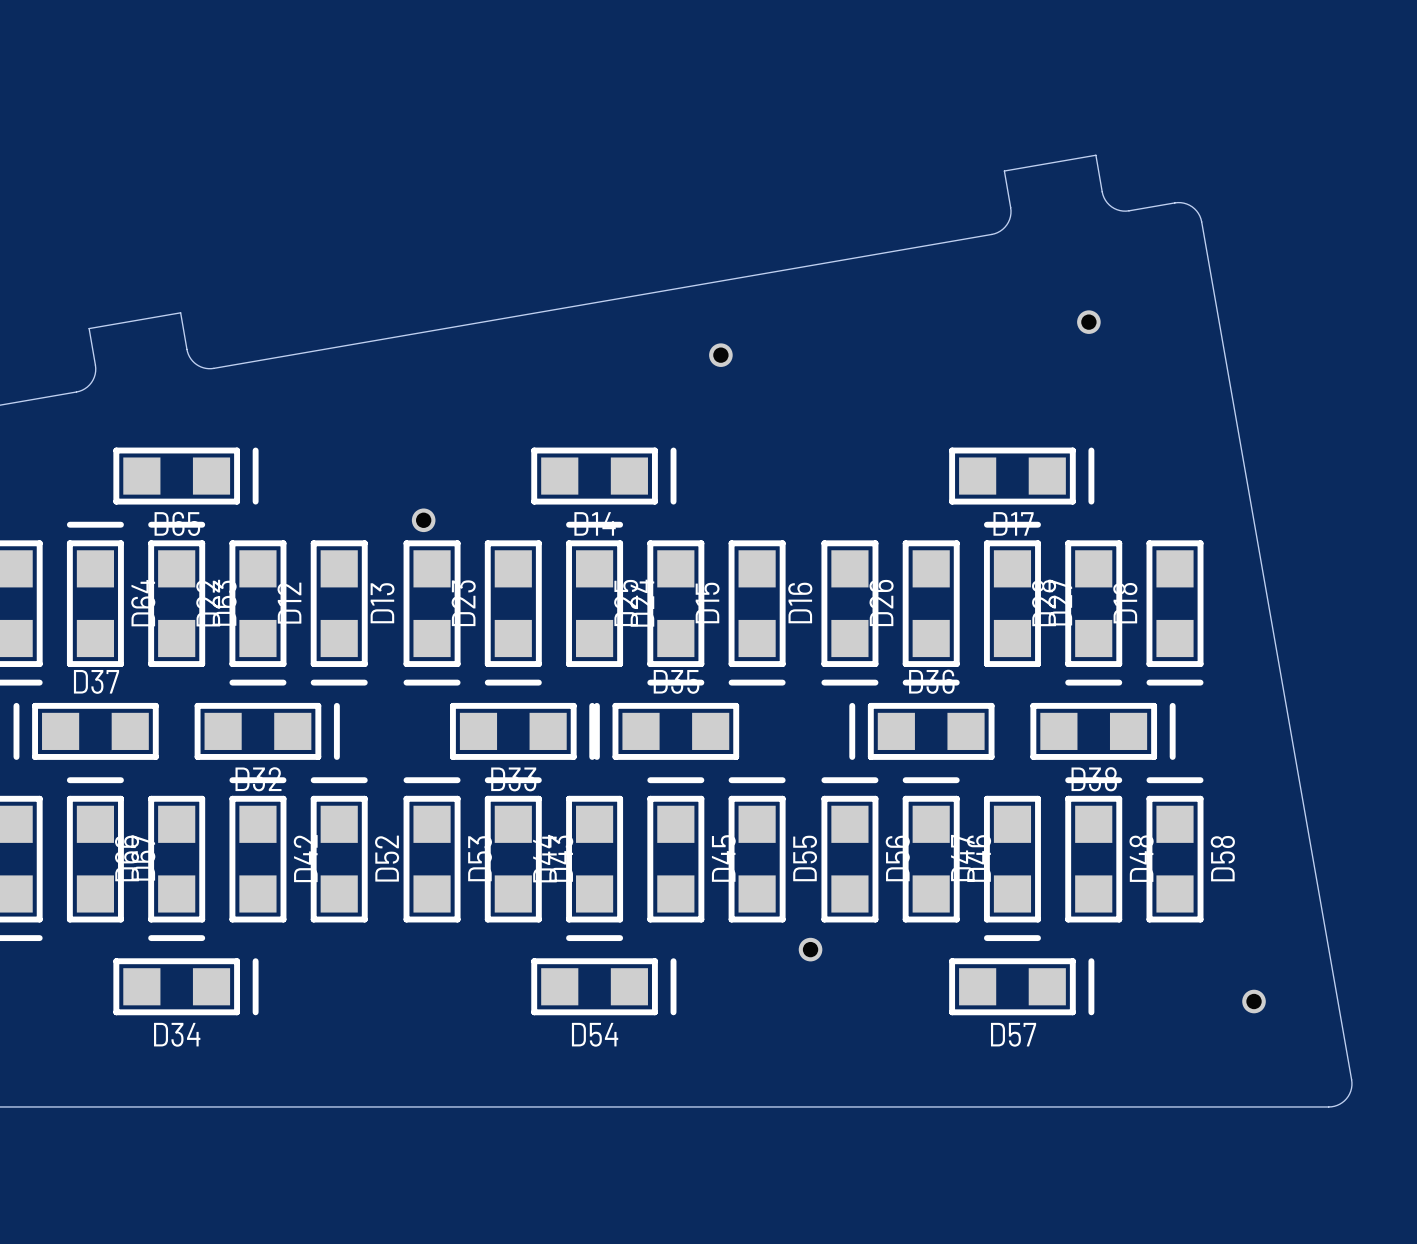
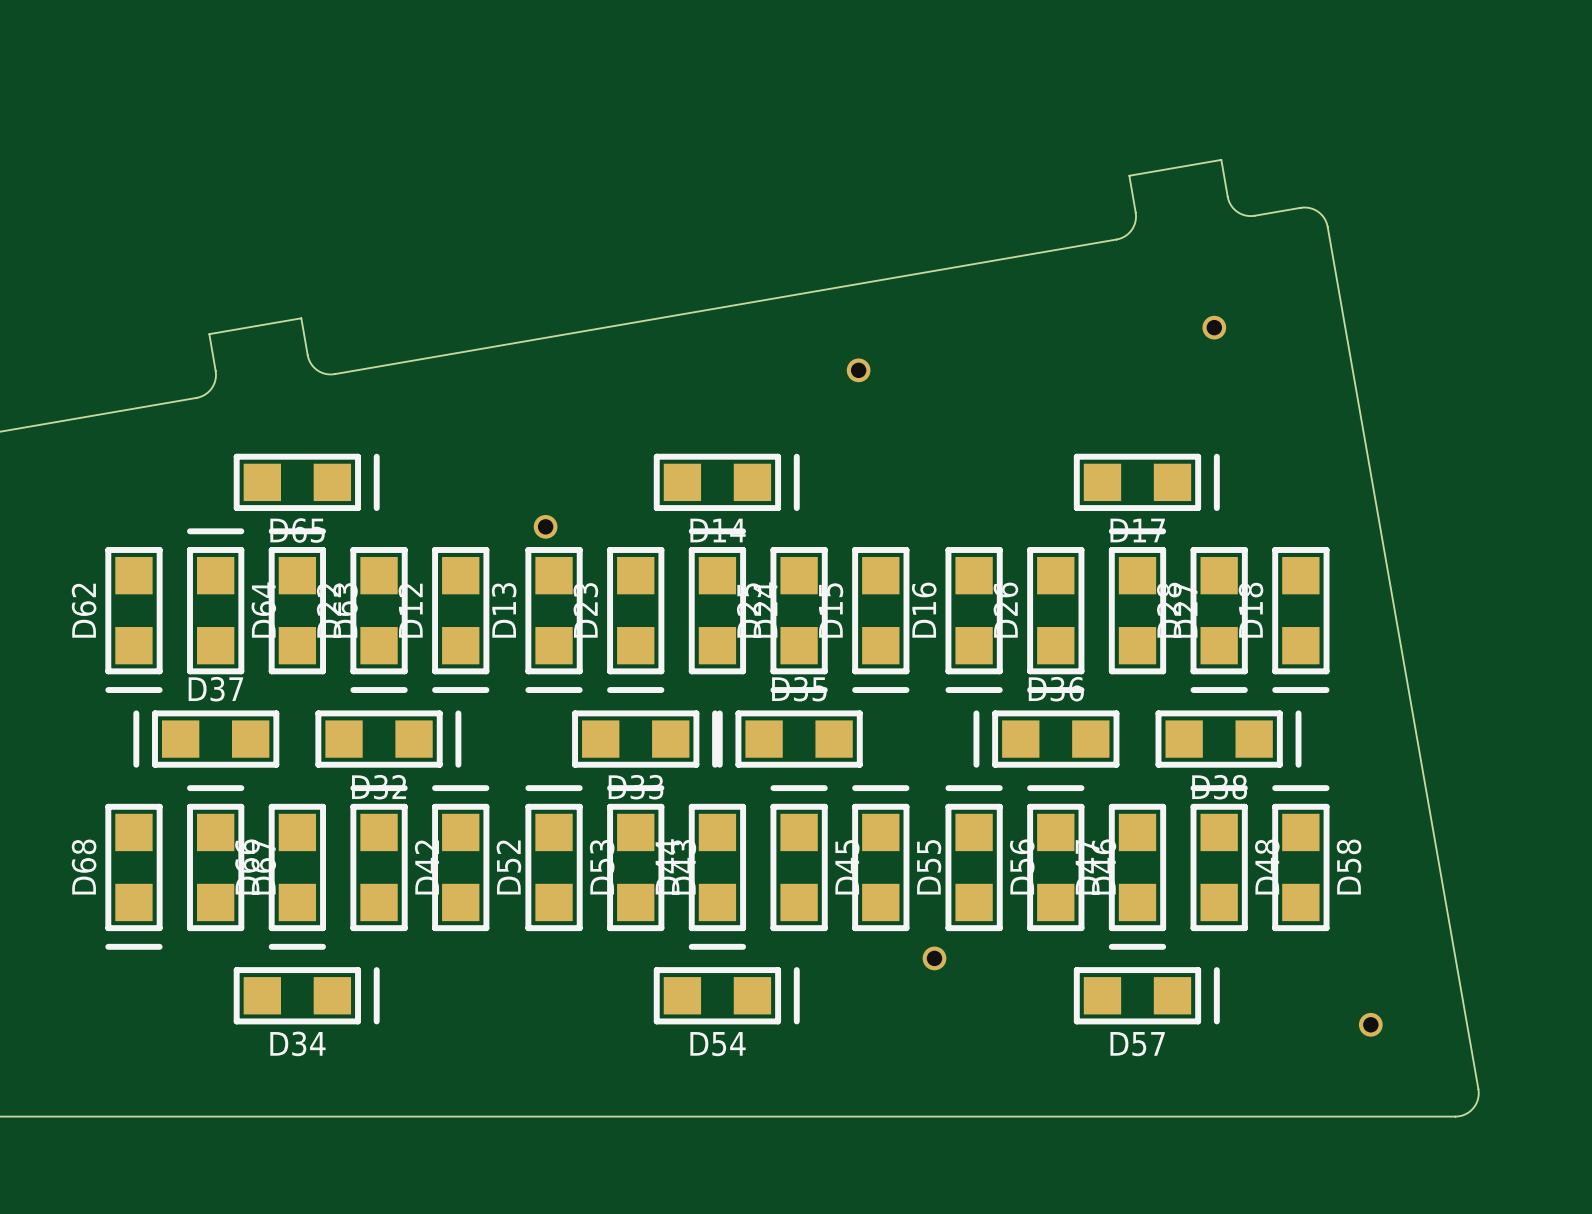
part position: (720, 355) -> (858, 370)
part position: (1254, 1001) -> (1370, 1024)

